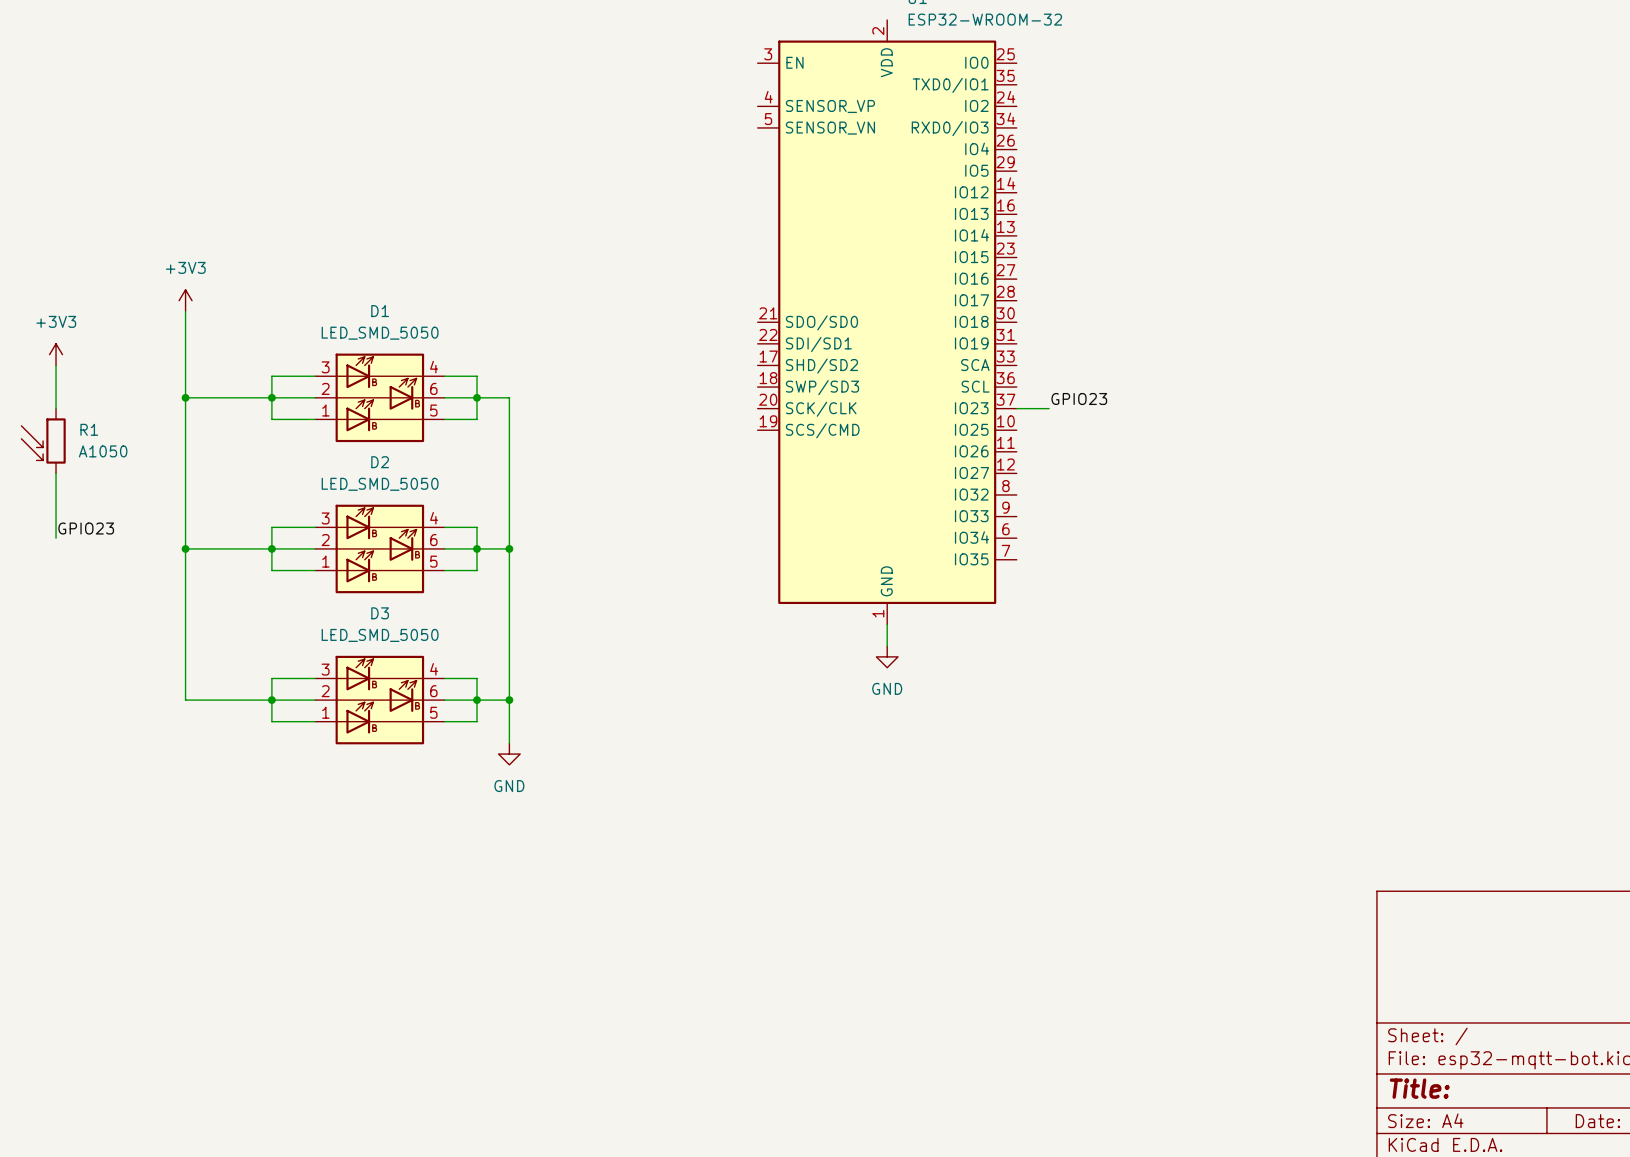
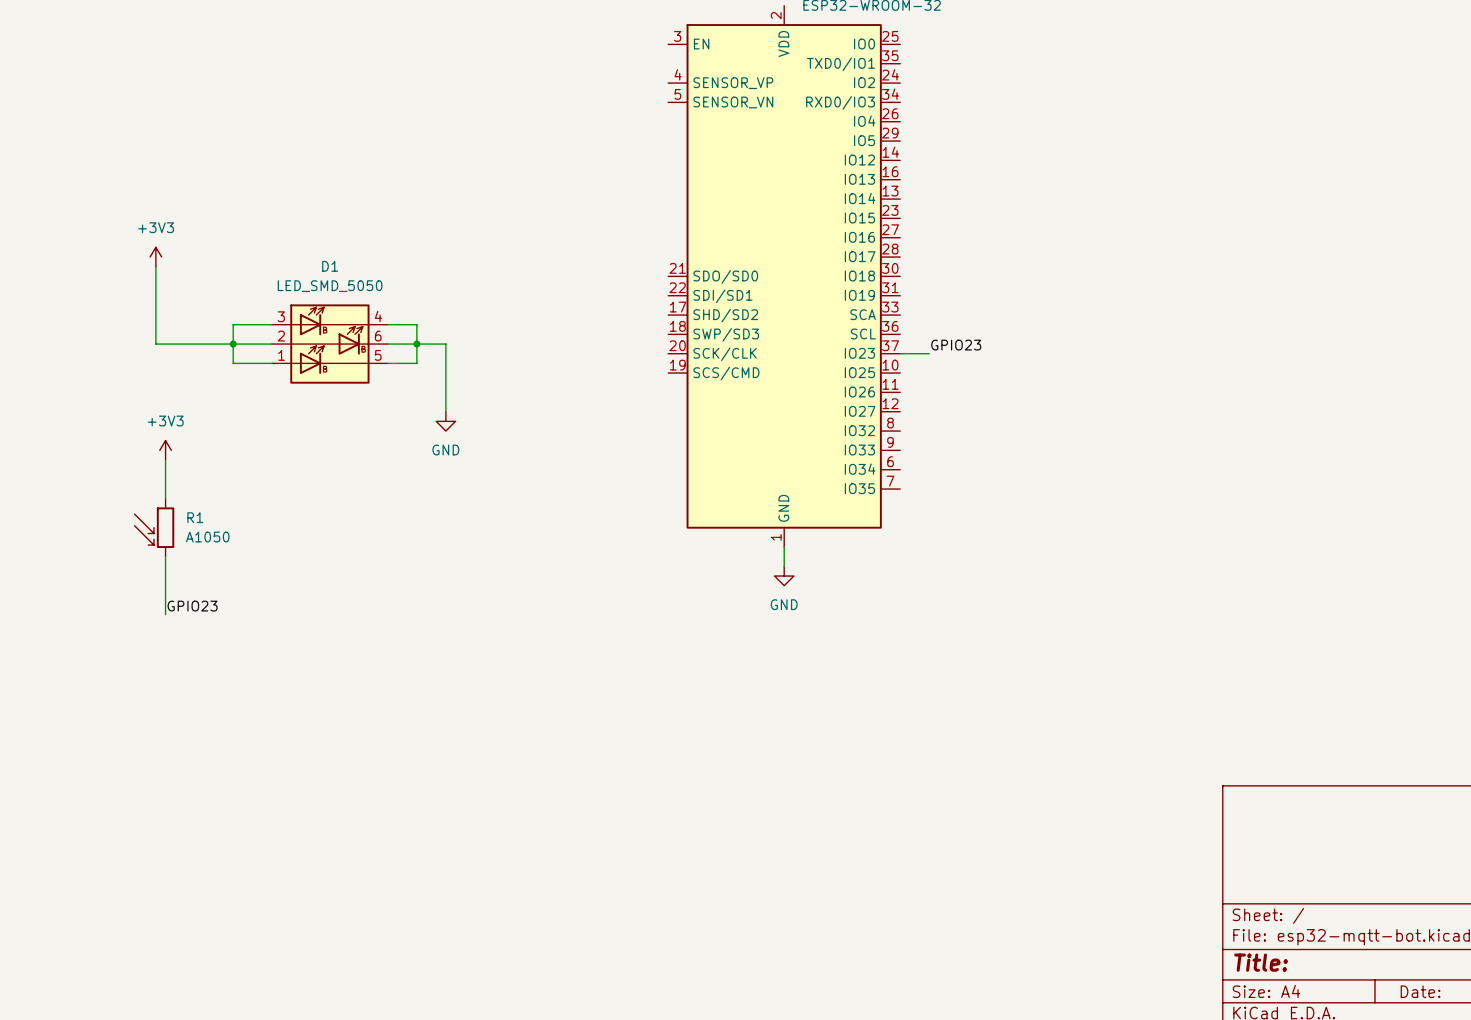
power symbol: +3V3 (56, 354) -> none
wire: (56, 365) (56, 408) -> none
wire: (185, 397) (185, 700) (315, 700) -> none
junction: (185, 397) -> none
R1 position: (43, 441) -> (154, 527)
wire: (56, 473) (56, 538) -> none
wire: (509, 473) (509, 743) -> none
power symbol: none -> GND (445, 421)
power symbol: none -> +3V3 (165, 450)
wire: none -> (165, 460) (165, 498)
wire: (315, 527) (271, 527) (271, 570) (315, 570) -> none
wire: (444, 527) (477, 527) (477, 570) (444, 570) -> none
label: GPIO23 (86, 528) -> none
wire: (185, 548) (315, 548) -> none
junction: (185, 548) -> none
junction: (271, 548) -> none
D2: LED_SMD_5050 (379, 548) -> none
wire: (444, 548) (509, 548) -> none
junction: (477, 548) -> none
junction: (509, 548) -> none
wire: none -> (165, 556) (165, 614)
wire: (315, 678) (271, 678) (271, 721) (315, 721) -> none
wire: (444, 678) (477, 678) (477, 721) (444, 721) -> none
label: none -> GPIO23 (192, 606)
junction: (271, 700) -> none
D3: LED_SMD_5050 (379, 700) -> none
wire: (444, 700) (509, 700) -> none
junction: (477, 700) -> none
junction: (509, 700) -> none
power symbol: GND (509, 754) -> none

